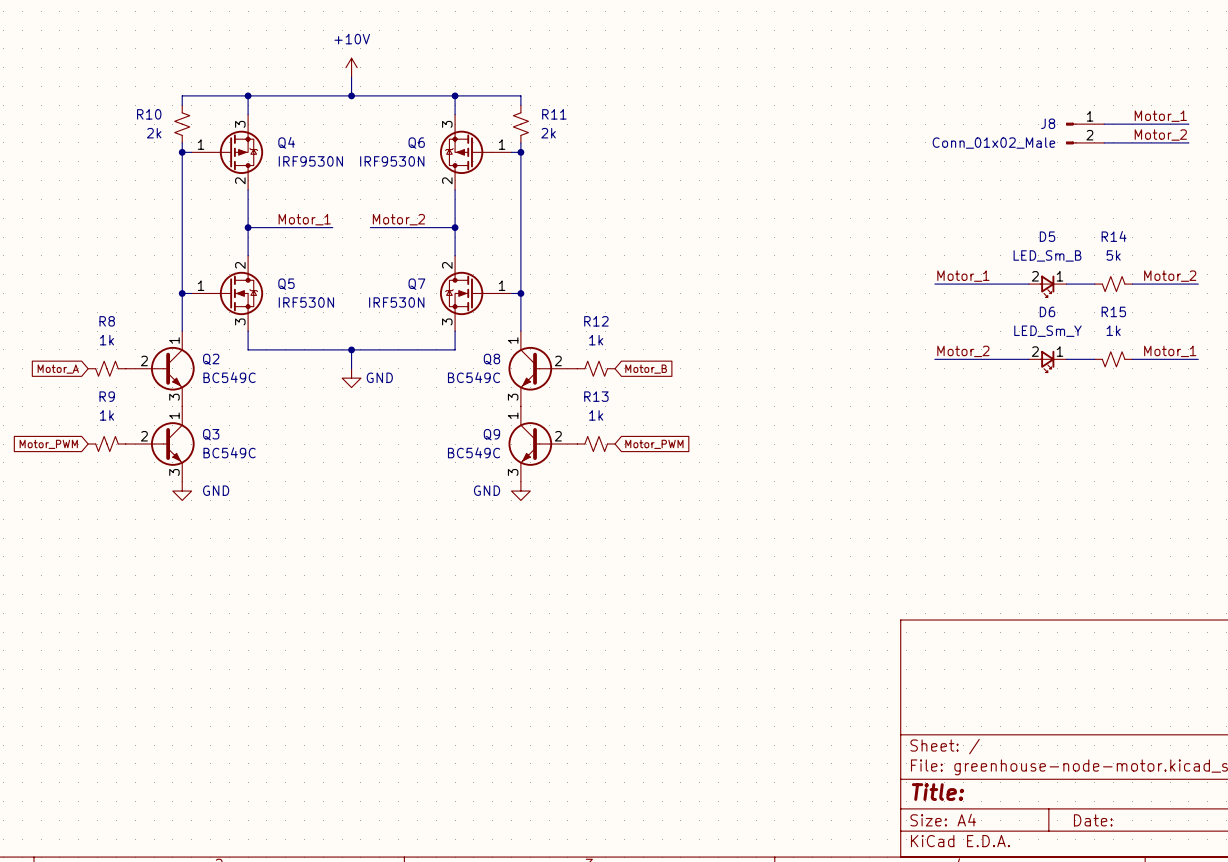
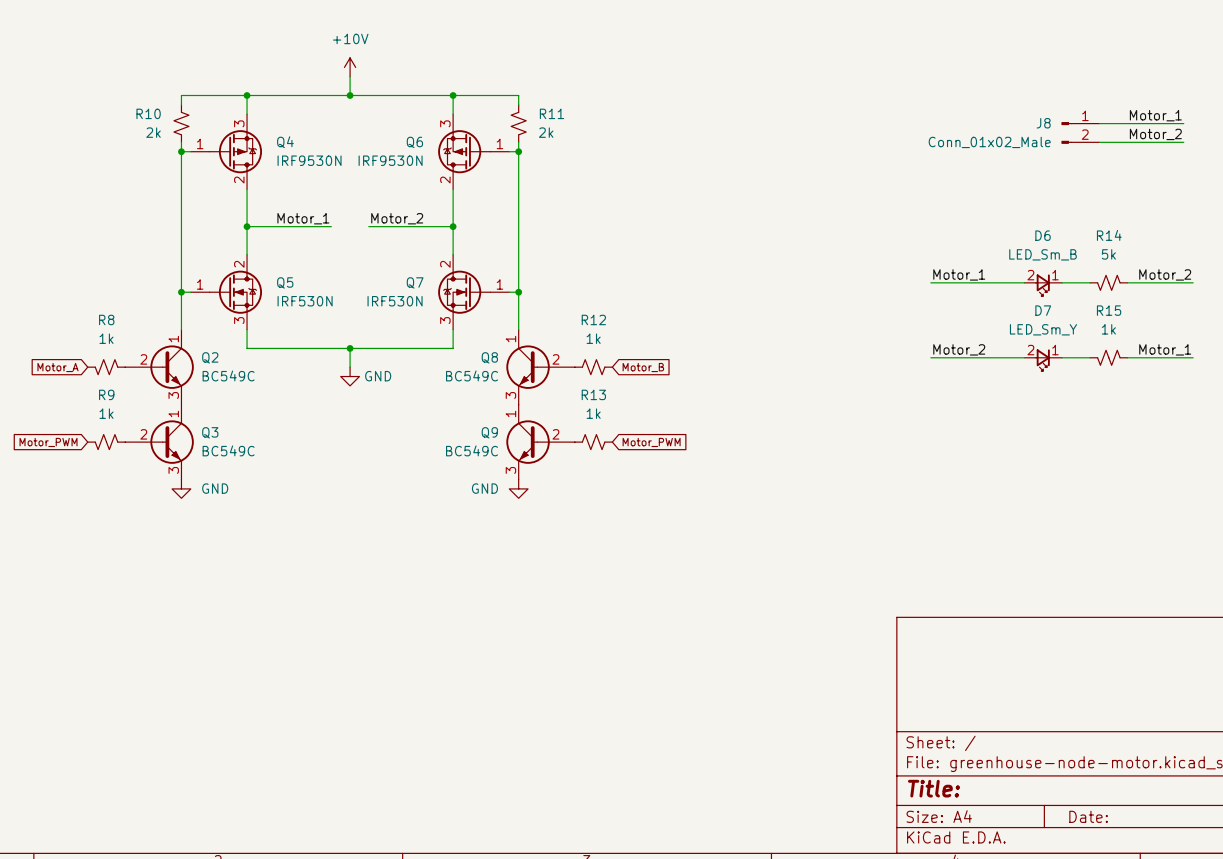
D5 name: D5 (1047, 236) -> D6 (1043, 235)
D6 name: D6 (1047, 311) -> D7 (1043, 310)

